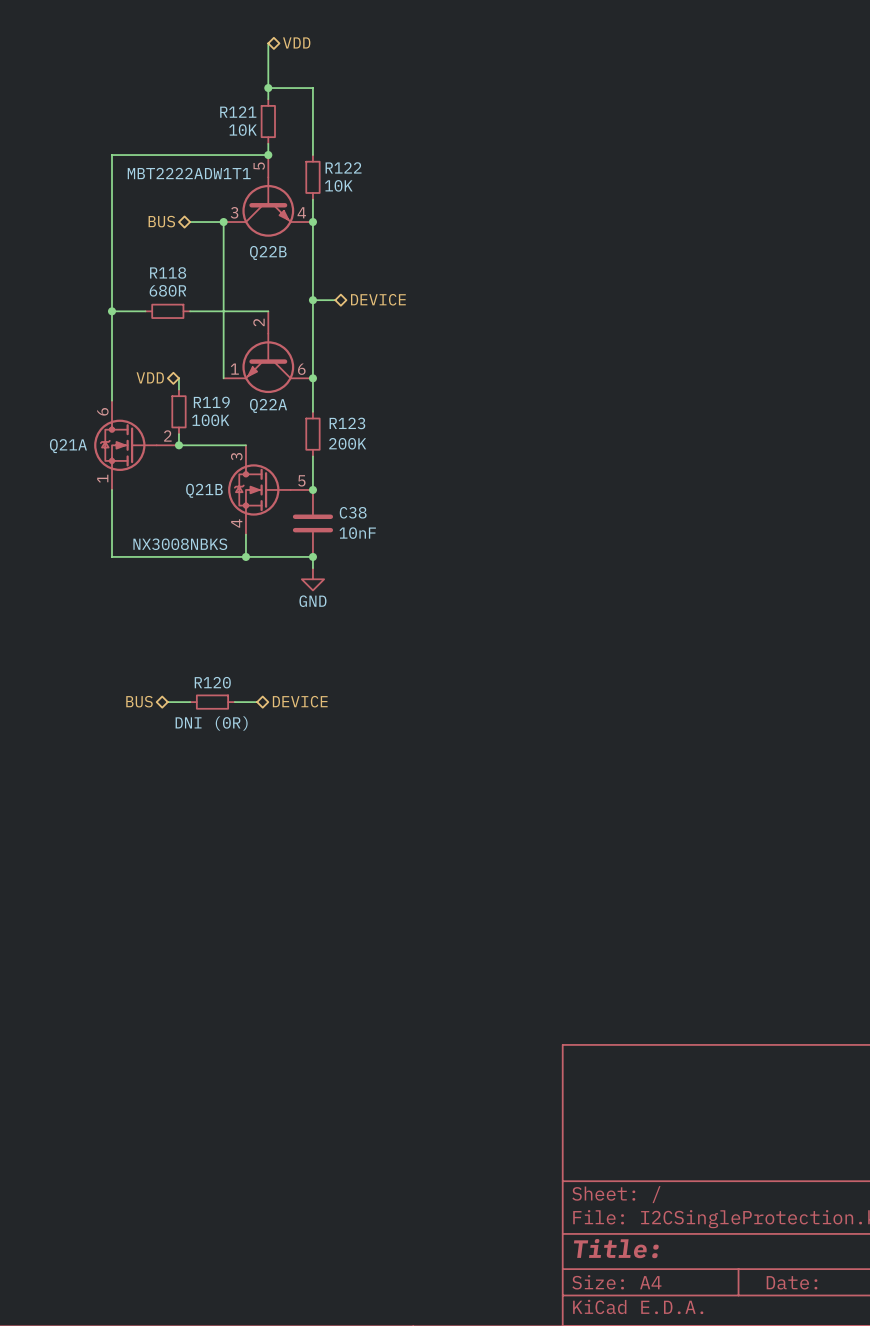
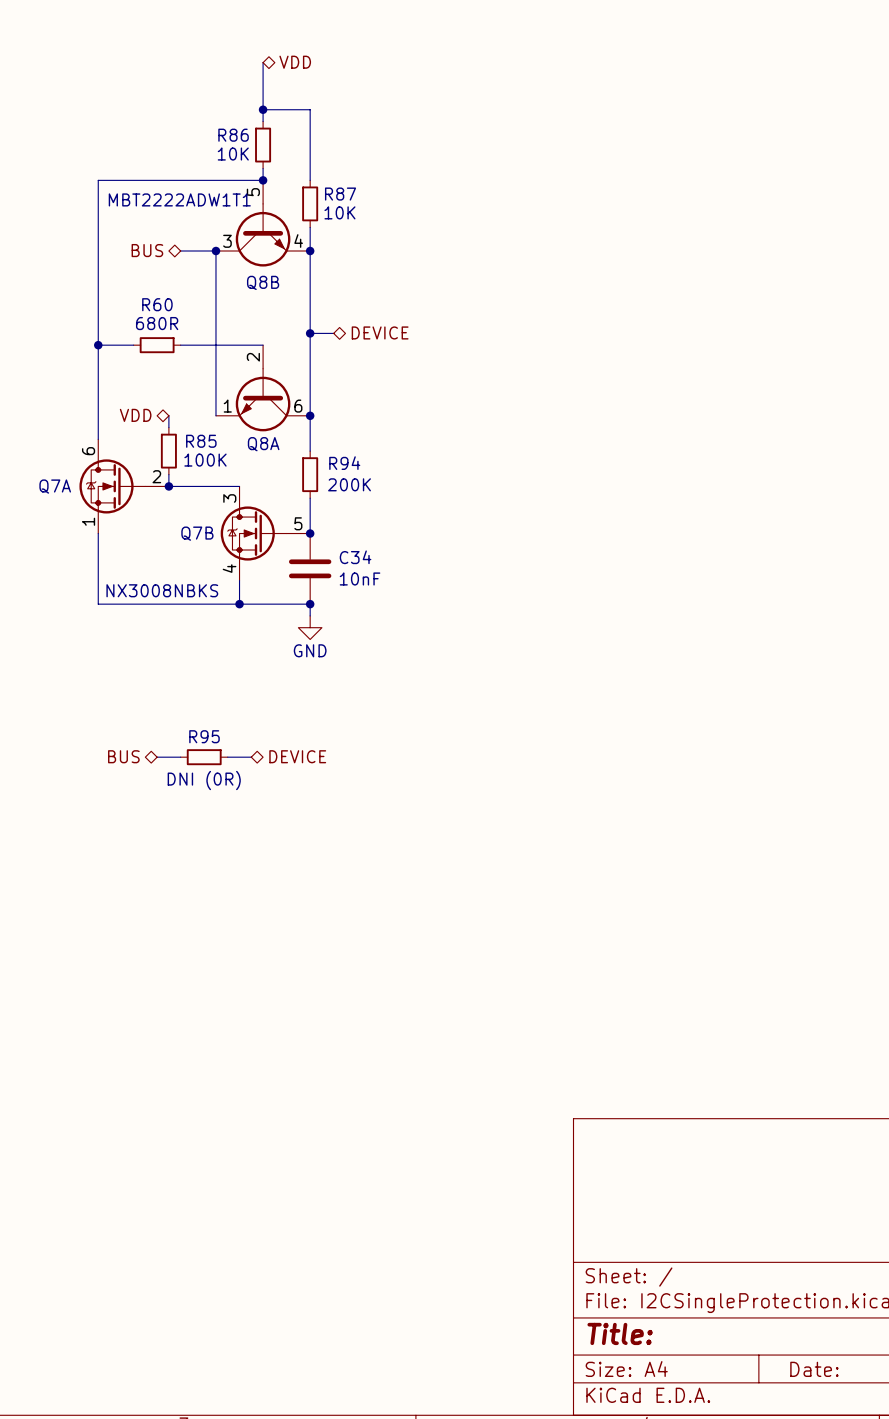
R121 name: R121 (238, 112) -> R86 (233, 135)
R122 name: R122 (343, 167) -> R87 (340, 194)
Q22B name: Q22B (268, 252) -> Q8B (263, 282)
R118 name: R118 (168, 272) -> R60 (157, 304)
R119 name: R119 (211, 402) -> R85 (201, 441)
Q22A name: Q22A (268, 405) -> Q8A (263, 444)
R123 name: R123 (347, 423) -> R94 (344, 463)
Q21A name: Q21A (68, 446) -> Q7A (55, 486)
Q21B name: Q21B (204, 490) -> Q7B (197, 533)
C38 name: C38 (353, 512) -> C34 (355, 557)
R120 name: R120 (212, 682) -> R95 (204, 736)

